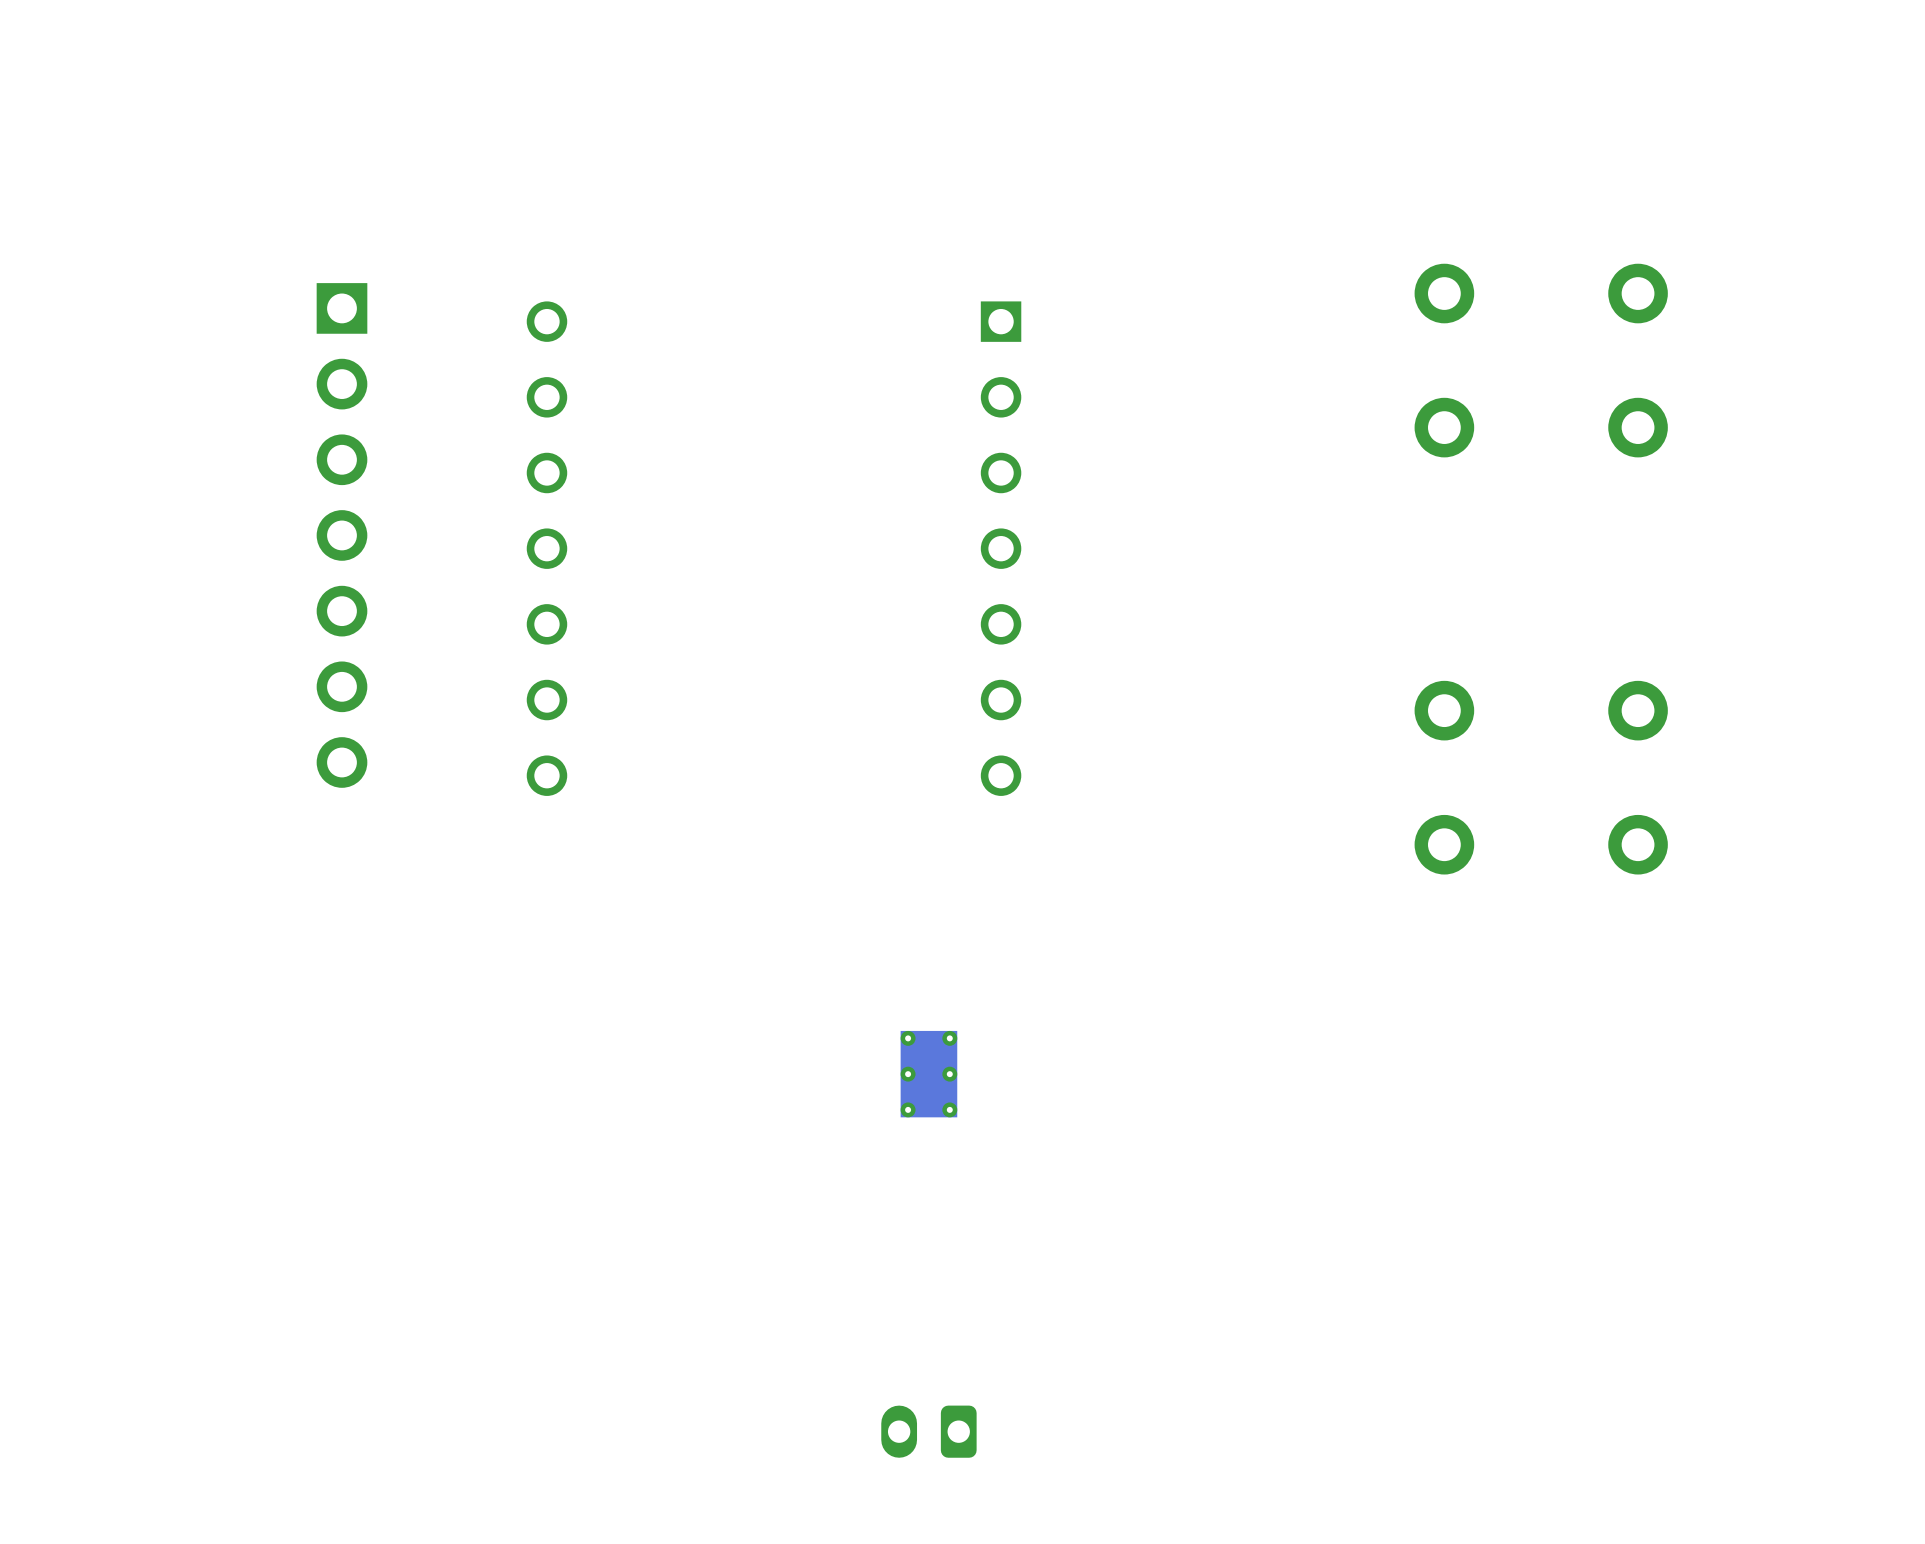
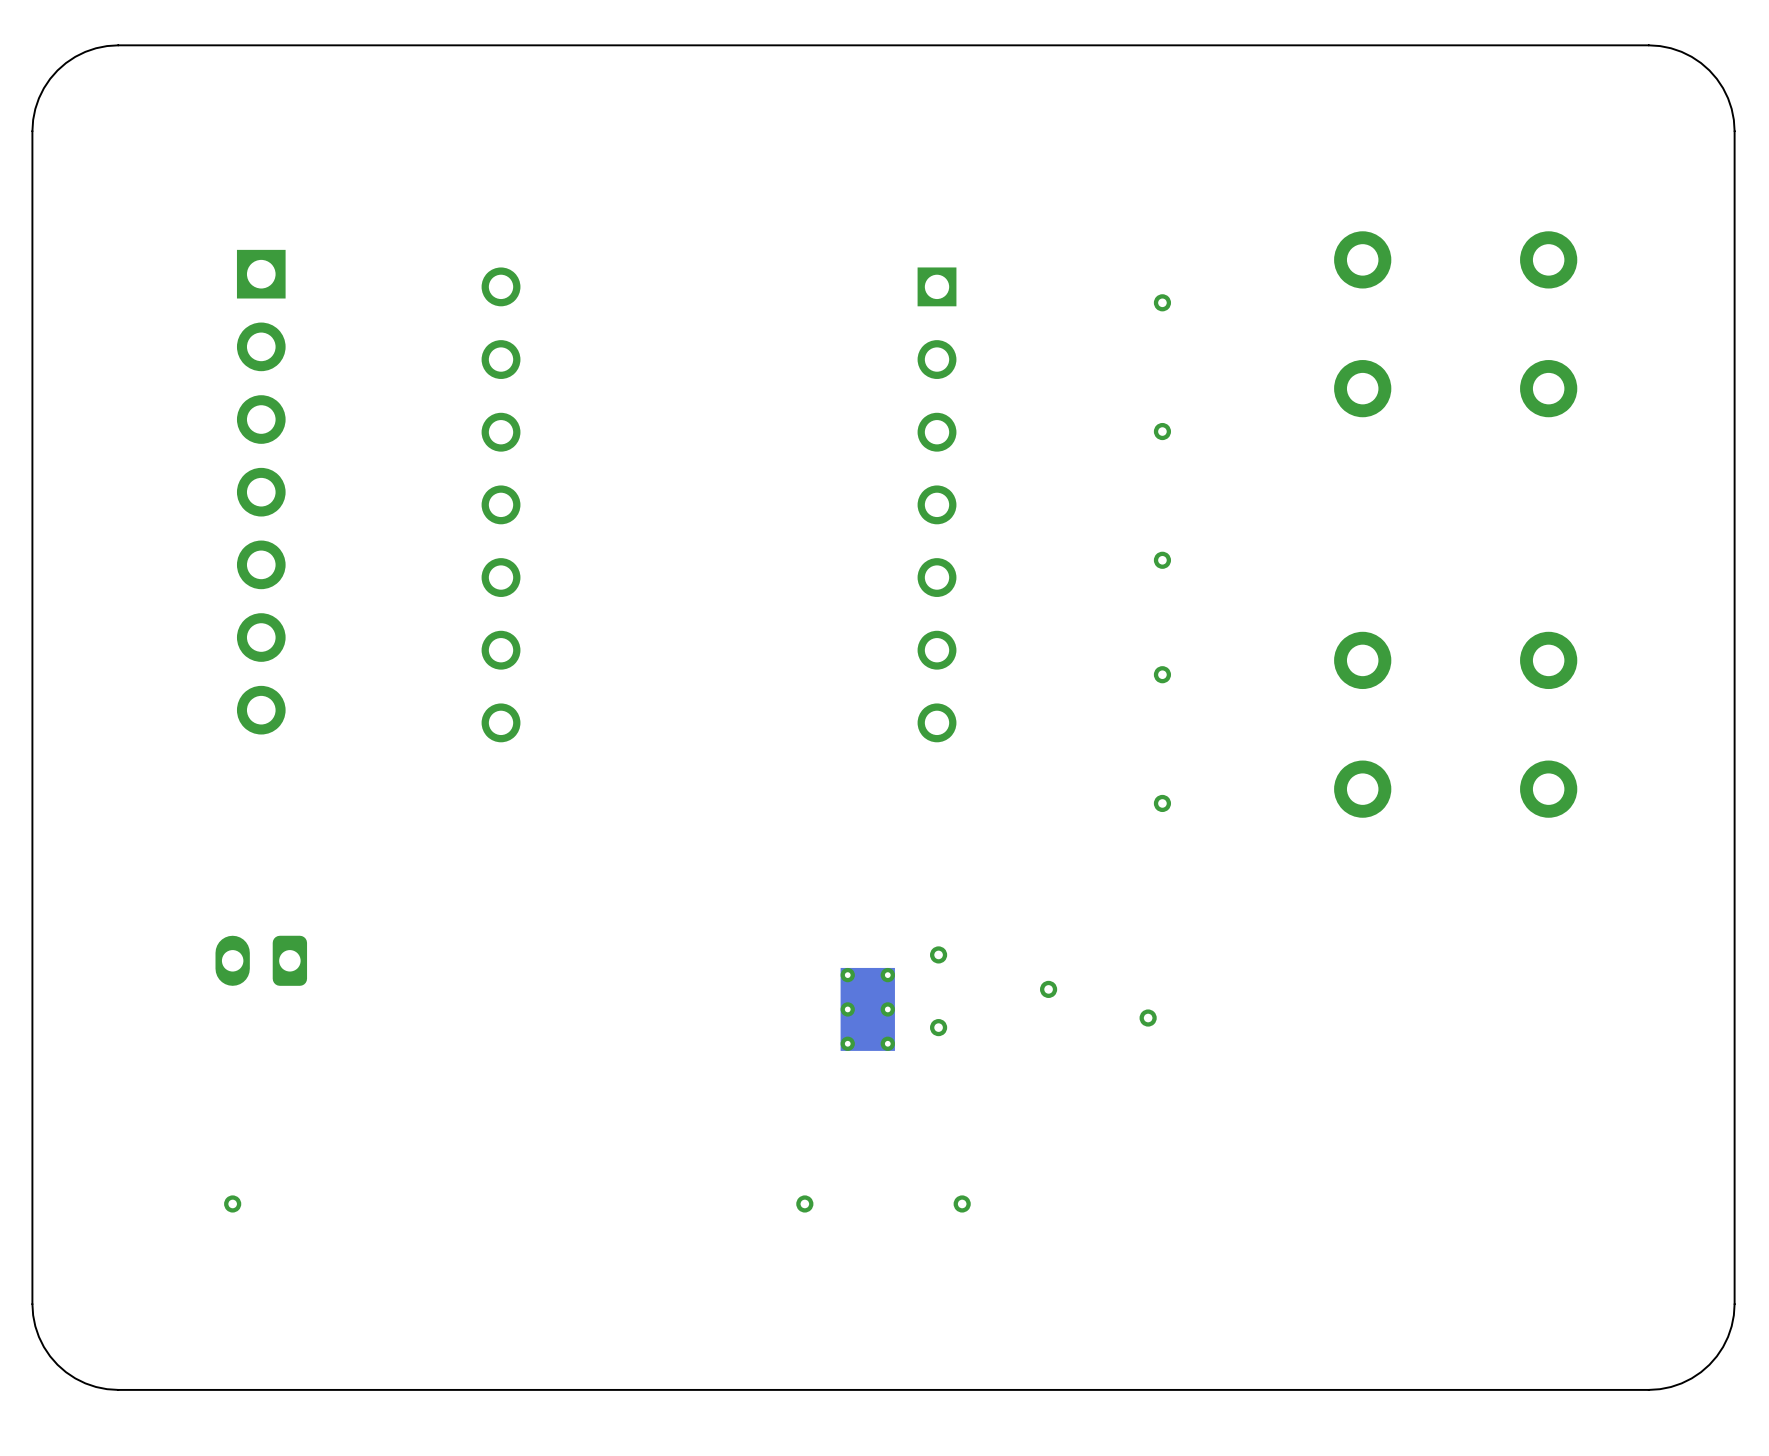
board edge: none -> (1648, 45) (118, 45) (85, 51) (65, 63) (43, 88) (35, 108) (32, 131) (32, 1304) (35, 1326) (50, 1356) (65, 1372) (85, 1383) (118, 1389) (1648, 1389) (1671, 1387) (1701, 1372) (1716, 1356) (1728, 1336) (1734, 1304) (1734, 131) (1728, 98) (1709, 70) (1681, 51) (1648, 45)
via: none -> (1162, 302)
via: none -> (1162, 431)
part position: (341, 535) -> (261, 492)
via: none -> (1162, 560)
via: none -> (1162, 674)
via: none -> (1162, 803)
via: none -> (938, 954)
part: none -> (261, 960)
via: none -> (1048, 989)
via: none -> (1148, 1018)
via: none -> (938, 1027)
via: none -> (232, 1203)
via: none -> (804, 1203)
via: none -> (962, 1203)
part: (928, 1431) -> none

